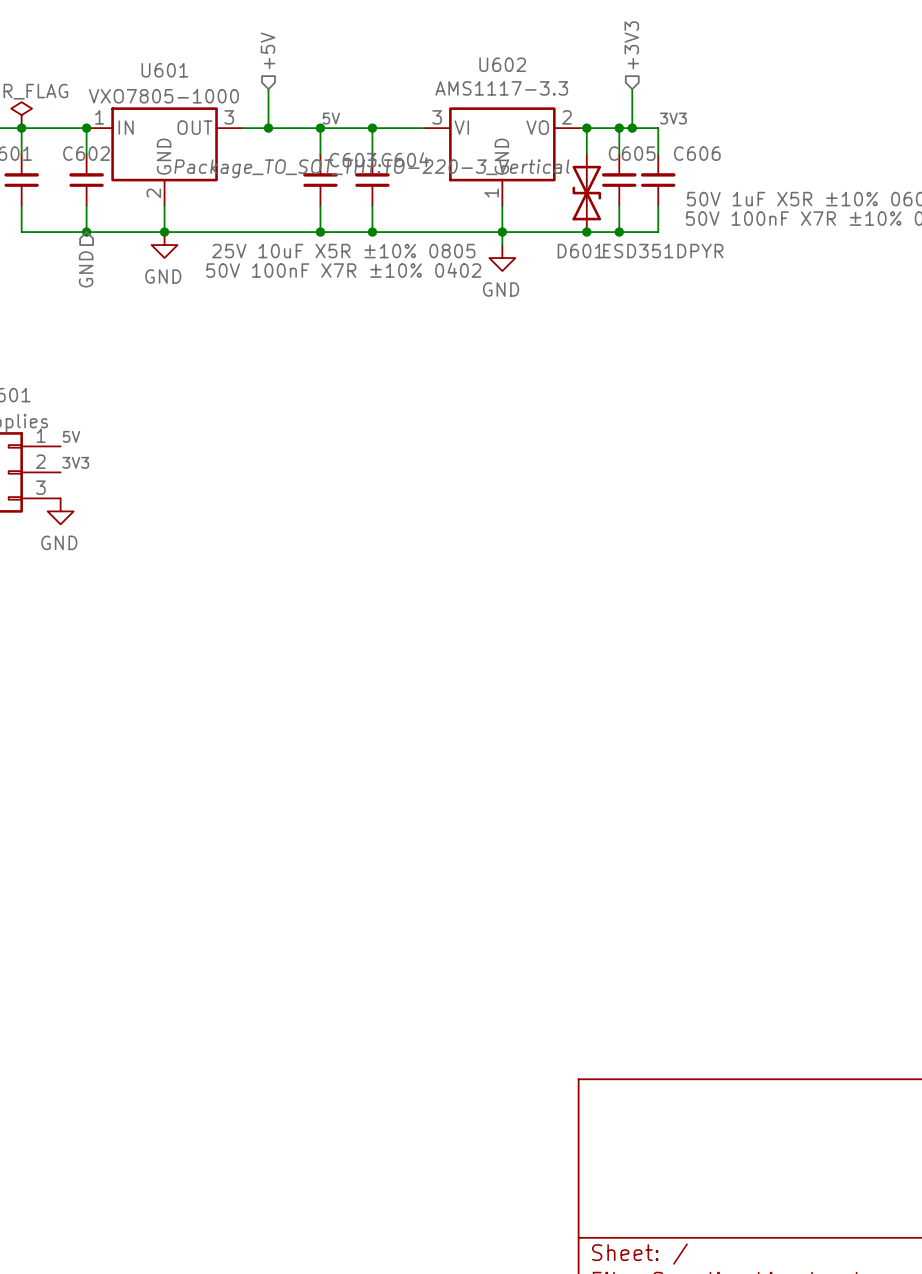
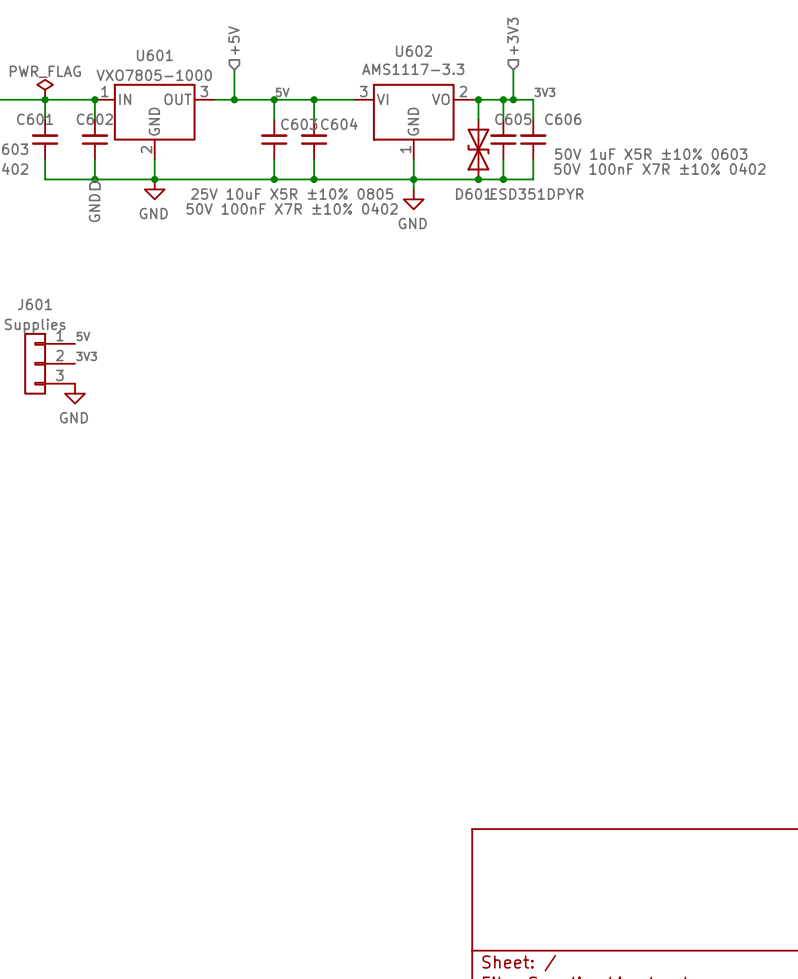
U601 text: Package_TO_SOT_THT:TO-220-3_Vertical (371, 168) -> none

